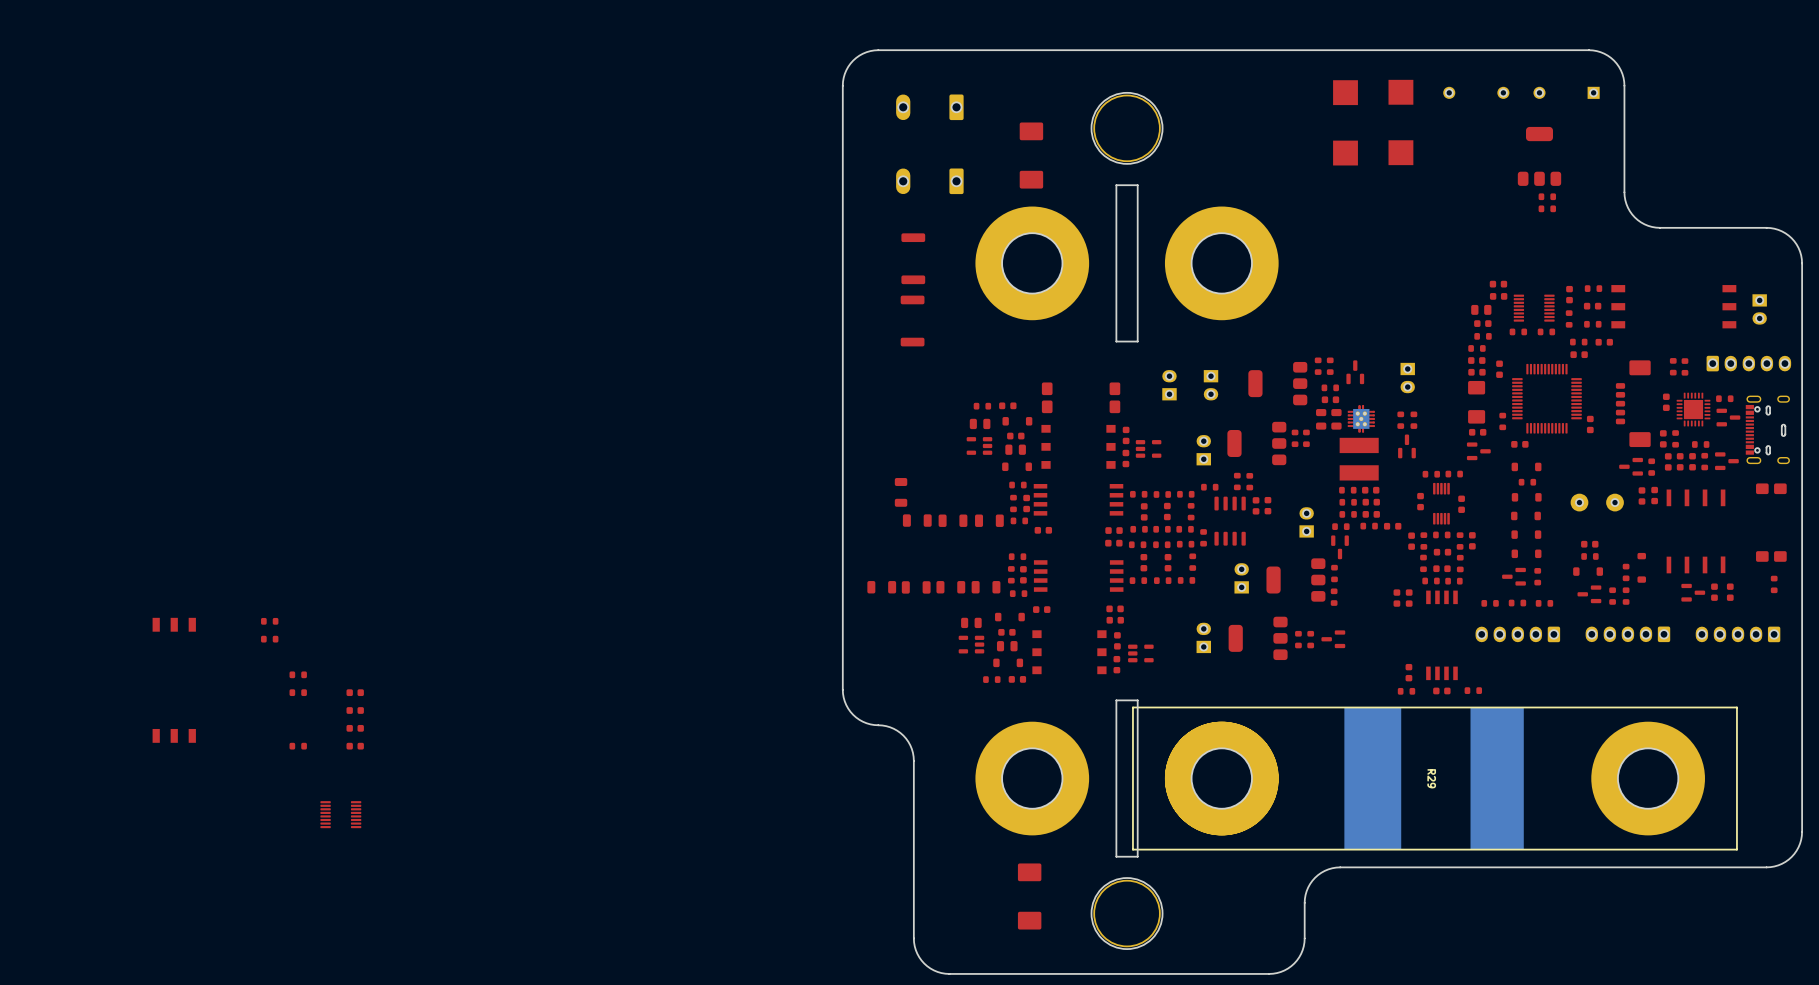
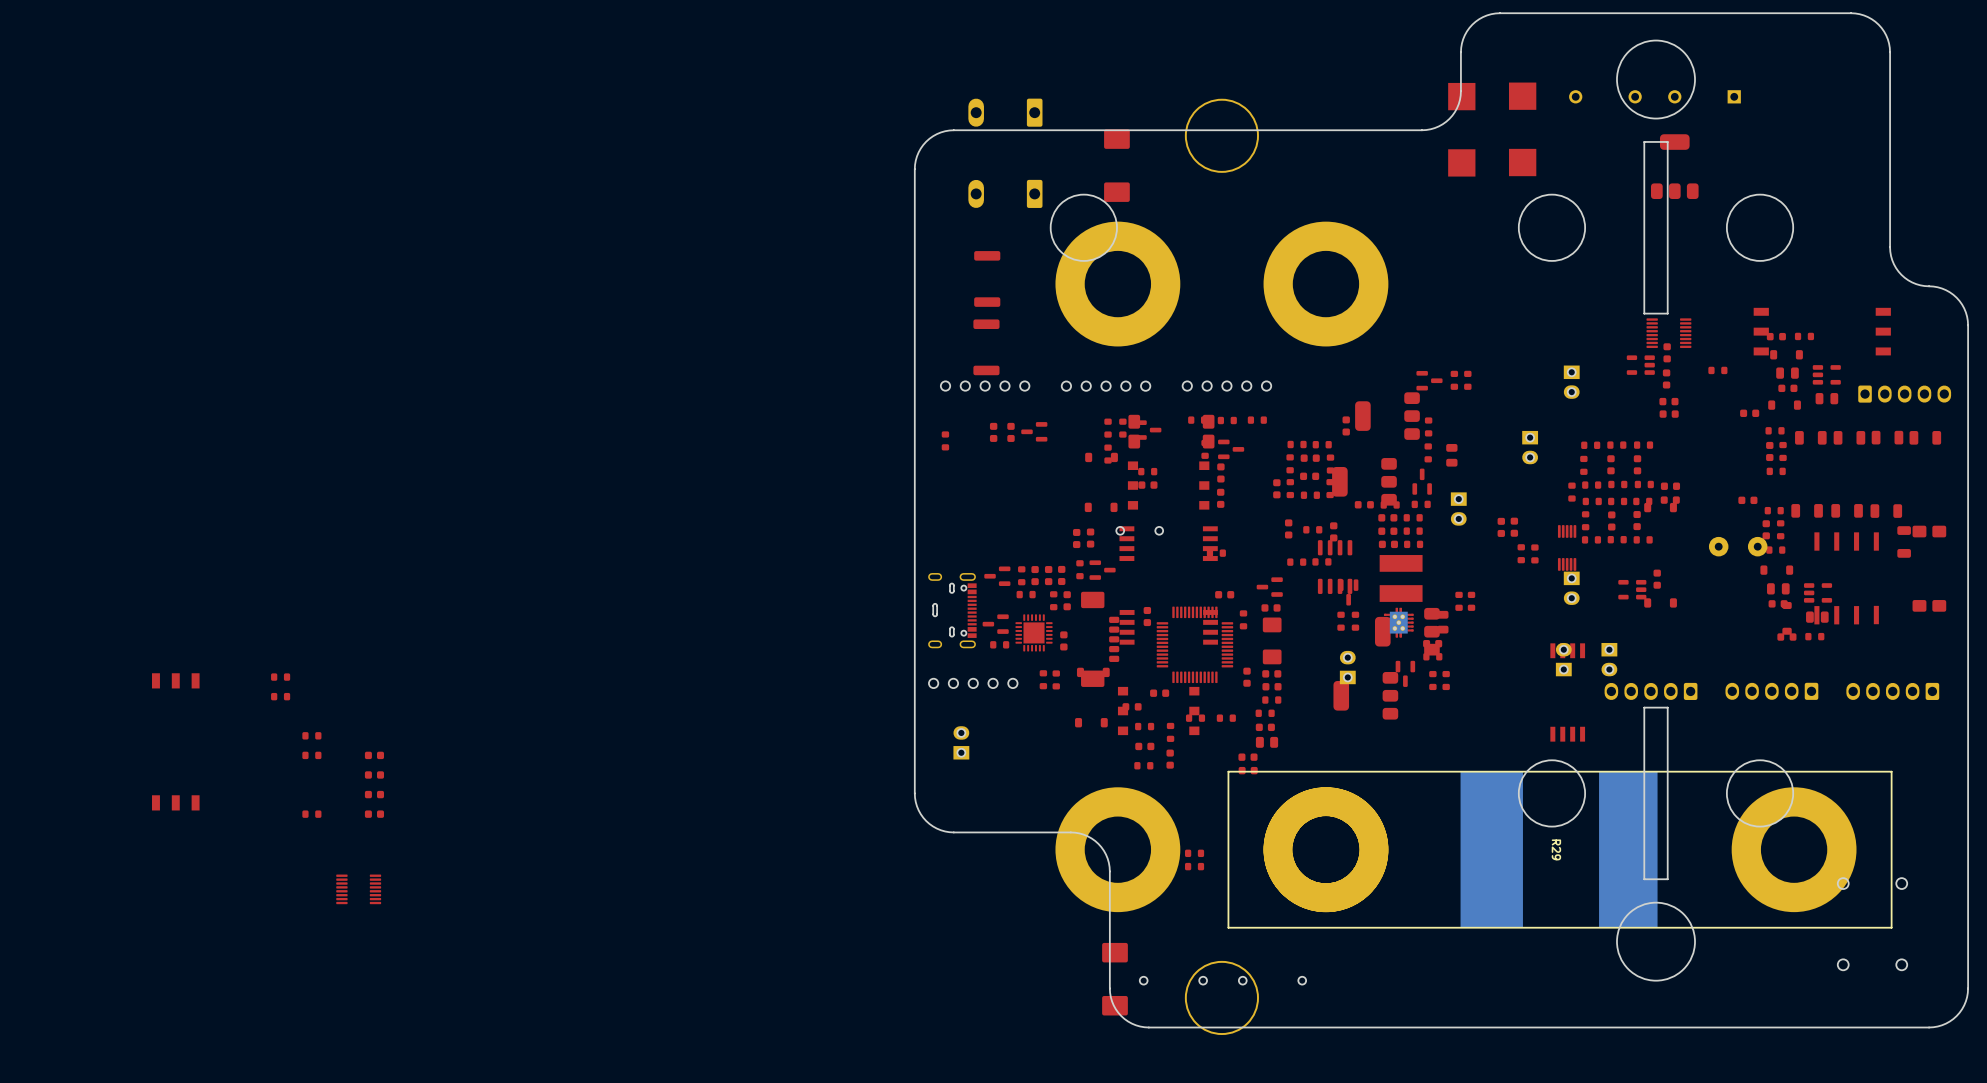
round board edge: none -> [1616, 39, 1696, 120]
board edge: (1588, 50) (878, 50) (862, 53) (850, 63) (844, 73) (842, 85) (843, 693) (848, 708) (856, 717) (866, 723) (886, 726) (897, 730) (906, 738) (911, 749) (913, 760) (914, 942) (919, 957) (927, 966) (937, 971) (949, 973) (1273, 973) (1288, 968) (1299, 957) (1304, 942) (1306, 891) (1315, 877) (1332, 868) (1766, 867) (1781, 863) (1794, 853) (1800, 843) (1802, 831) (1801, 255) (1791, 238) (1774, 228) (1655, 227) (1644, 224) (1634, 217) (1627, 207) (1624, 196) (1623, 77) (1619, 66) (1611, 57) (1600, 52) (1588, 50) -> (1851, 13) (1863, 15) (1875, 21) (1884, 31) (1889, 47) (1890, 247) (1892, 260) (1898, 271) (1908, 280) (1920, 285) (1941, 288) (1953, 294) (1962, 304) (1967, 320) (1968, 988) (1965, 1001) (1959, 1012) (1946, 1023) (1929, 1027) (1148, 1027) (1135, 1025) (1124, 1018) (1115, 1009) (1110, 992) (1109, 867) (1105, 854) (1098, 843) (1087, 836) (1075, 832) (945, 831) (926, 821) (915, 802) (914, 169) (916, 156) (923, 144) (936, 134) (953, 130) (1426, 130) (1442, 124) (1454, 112) (1460, 95) (1460, 52) (1463, 39) (1472, 24) (1491, 14) (1851, 13)
round board edge: [1445, 88, 1454, 97] -> none
round board edge: [1499, 88, 1508, 97] -> none
round board edge: [1535, 88, 1544, 97] -> none
round board edge: [1589, 88, 1598, 97] -> none
round board edge: [1090, 92, 1164, 165] -> none
round board edge: [897, 101, 909, 113] -> none
round board edge: [950, 101, 963, 113] -> none
board edge: none -> (1667, 141) (1667, 313) (1644, 313) (1644, 141) (1667, 141)
round board edge: [897, 175, 909, 187] -> none
round board edge: [950, 175, 963, 187] -> none
round board edge: none -> [1518, 194, 1586, 262]
round board edge: none -> [1726, 194, 1794, 262]
board edge: (1137, 185) (1137, 341) (1116, 341) (1116, 185) (1137, 185) -> none
part: (1547, 196) -> none
part: (1547, 208) -> none
round board edge: [1191, 232, 1253, 295] -> none
round board edge position: (1032, 263) -> (1083, 227)
part: (1498, 284) -> none
part: (1593, 288) -> none
part: (1569, 294) -> none
part: (1498, 296) -> none
round board edge: [1755, 296, 1764, 305] -> none
part: (1592, 306) -> none
part: (1481, 309) -> none
part: (1759, 309) -> none
part: none -> (1804, 336)
round board edge: [1755, 314, 1764, 323] -> none
part: (1569, 318) -> none
part: (1482, 323) -> none
part: (1592, 324) -> none
part: none -> (1667, 352)
part: none -> (1786, 354)
part: (1518, 331) -> none
part: (1546, 331) -> none
part: (1483, 336) -> none
part: none -> (1640, 365)
round board edge: none -> [1567, 367, 1577, 377]
part position: (1604, 342) -> (1776, 336)
part: none -> (1787, 373)
part: none -> (1826, 374)
part: (1476, 348) -> none
part: none -> (1666, 378)
round board edge: none -> [940, 380, 951, 392]
round board edge: none -> [960, 380, 971, 392]
round board edge: none -> [979, 380, 991, 392]
round board edge: none -> [999, 380, 1011, 392]
round board edge: none -> [1019, 380, 1031, 392]
round board edge: none -> [1061, 380, 1072, 392]
round board edge: none -> [1080, 380, 1092, 392]
round board edge: none -> [1100, 380, 1112, 392]
round board edge: none -> [1120, 380, 1132, 392]
round board edge: none -> [1140, 380, 1151, 392]
round board edge: none -> [1181, 380, 1193, 392]
round board edge: none -> [1201, 380, 1213, 392]
round board edge: none -> [1221, 380, 1233, 392]
round board edge: none -> [1241, 380, 1253, 392]
round board edge: none -> [1261, 380, 1272, 392]
part: none -> (1454, 380)
part: none -> (1467, 380)
part: none -> (1571, 382)
part: (1579, 354) -> none
round board edge: none -> [1567, 387, 1577, 397]
part: none -> (1787, 388)
round board edge: [1707, 358, 1718, 369] -> none
round board edge: [1725, 358, 1736, 369] -> none
round board edge: [1744, 358, 1754, 369] -> none
round board edge: [1762, 358, 1772, 369] -> none
round board edge: [1780, 358, 1790, 369] -> none
part: (1476, 360) -> none
round board edge: [1403, 364, 1412, 374] -> none
part: (1318, 366) -> none
part: (1330, 366) -> none
part: (1673, 366) -> none
part: (1684, 366) -> none
part: none -> (1826, 398)
part: (1499, 369) -> none
part: none -> (1668, 401)
round board edge: [1165, 372, 1174, 381] -> none
round board edge: [1206, 372, 1216, 381] -> none
part rotation: 0° (1355, 372) -> 90° clockwise (1429, 380)
part position: (1355, 372) -> (1429, 380)
part: (1476, 372) -> none
part: none -> (1784, 405)
part: (1407, 378) -> none
part: none -> (1669, 414)
part: none -> (1749, 413)
part: (1169, 385) -> none
part: (1211, 385) -> none
part: none -> (1197, 420)
part: none -> (1227, 420)
part: none -> (1257, 420)
part: (1330, 387) -> none
round board edge position: (1407, 387) -> (1530, 437)
round board edge: [1165, 390, 1174, 399] -> none
round board edge: [1206, 390, 1216, 399] -> none
part: none -> (1346, 425)
part: none -> (1428, 426)
part footprint: [1662, 393, 1670, 411] -> [1795, 431, 1827, 445]
part: none -> (1108, 428)
part: none -> (1122, 428)
part: none -> (1148, 430)
part: none -> (1034, 431)
part: none -> (1775, 430)
part: none -> (993, 432)
part: none -> (1011, 432)
part: (1546, 398) -> none
part: (1724, 398) -> none
part: (1330, 399) -> none
part: (1476, 402) -> none
part: (1633, 403) -> none
part: none -> (1849, 437)
part: none -> (1887, 437)
part: none -> (1925, 437)
part: (1007, 405) -> none
part: none -> (945, 440)
part: (982, 406) -> none
board edge: (1770, 407) (1769, 413) (1767, 414) (1766, 407) (1770, 407) -> none
part: none -> (1297, 444)
part: none -> (1322, 444)
part footprint: [1316, 409, 1327, 430] -> [1424, 443, 1432, 463]
part: (1693, 409) -> none
part: none -> (1590, 445)
part: none -> (1616, 445)
part: none -> (1643, 445)
round board edge: [1356, 412, 1360, 416] -> none
round board edge: [1363, 412, 1367, 416] -> none
part: none -> (1530, 447)
part: none -> (1205, 449)
part: none -> (1231, 449)
part: none -> (1769, 451)
part: none -> (1783, 451)
round board edge: [1359, 417, 1363, 421] -> none
round board edge: none -> [1525, 452, 1535, 463]
part: (1728, 417) -> none
part: none -> (1108, 454)
part position: (1361, 418) -> (1398, 622)
part: (1400, 420) -> none
part: (1413, 420) -> none
part: none -> (1310, 458)
part: (1502, 421) -> none
round board edge: [1356, 422, 1360, 426] -> none
round board edge: [1363, 422, 1367, 426] -> none
part: (980, 423) -> none
part: (1590, 424) -> none
board edge: (1785, 426) (1785, 434) (1783, 435) (1781, 426) (1783, 424) (1785, 426) -> none
part: none -> (1290, 463)
part: none -> (1330, 464)
part: none -> (1637, 464)
part: none -> (1583, 465)
part footprint: [1303, 429, 1310, 448] -> [1412, 468, 1432, 495]
part: (1767, 429) -> none
part rotation: 0° (1477, 432) -> 90° clockwise (1610, 464)
part: none -> (1776, 471)
part: none -> (1147, 471)
part: (1015, 436) -> none
round board edge: [1199, 437, 1208, 446] -> none
part: none -> (1309, 476)
part: (1295, 438) -> none
part: (1663, 438) -> none
part: (1675, 438) -> none
part: (1519, 444) -> none
part: (1700, 444) -> none
part: (979, 445) -> none
part: none -> (1617, 484)
part: none -> (1644, 484)
part: none -> (1147, 485)
part: (1406, 446) -> none
part: none -> (1591, 485)
part: none -> (1670, 486)
board edge: (1770, 447) (1769, 453) (1767, 454) (1766, 447) (1770, 447) -> none
part: (1148, 448) -> none
part: (1015, 449) -> none
part: none -> (1276, 488)
part: none -> (1290, 488)
part: none -> (1330, 488)
part: (1203, 450) -> none
part: (1478, 451) -> none
part: none -> (1571, 492)
round board edge: [1199, 455, 1208, 464] -> none
part: none -> (1310, 495)
round board edge: none -> [1454, 494, 1464, 504]
part footprint: [1619, 457, 1643, 476] -> [1764, 506, 1784, 515]
part position: (1359, 459) -> (1401, 578)
part: none -> (1670, 500)
part: none -> (1747, 500)
part: none -> (1592, 501)
part: none -> (1617, 501)
part: none -> (1642, 501)
part: (1668, 461) -> none
part: (1680, 461) -> none
part: (1692, 461) -> none
part: (1704, 461) -> none
part: (1726, 461) -> none
part: none -> (1364, 504)
part: none -> (1390, 504)
part: none -> (1421, 504)
part: (1651, 467) -> none
part: none -> (1458, 509)
part: none -> (1807, 510)
part: none -> (1847, 510)
part: none -> (1886, 511)
round board edge: none -> [1454, 514, 1464, 524]
part: (1431, 474) -> none
part rotation: 0° (1454, 474) -> 90° clockwise (1585, 520)
part: none -> (1387, 517)
part: none -> (1413, 517)
part: none -> (1637, 520)
part: none -> (1611, 520)
part: (1237, 481) -> none
part: (1249, 481) -> none
part: (1527, 482) -> none
round board edge: none -> [1115, 526, 1125, 536]
round board edge: none -> [1154, 526, 1164, 536]
part: none -> (1514, 527)
part: (1017, 485) -> none
part: none -> (1501, 527)
part: none -> (1288, 528)
part: none -> (1766, 529)
part: none -> (1780, 529)
part: none -> (1387, 531)
part: none -> (1413, 531)
part: none -> (1333, 531)
part: (1347, 490) -> none
part: (1370, 490) -> none
part: (901, 492) -> none
part: none -> (1090, 538)
part: (1138, 494) -> none
part: (1162, 494) -> none
part: (1185, 494) -> none
part: none -> (1076, 538)
part: (1641, 495) -> none
part: (1654, 495) -> none
part: none -> (1591, 539)
part: none -> (1617, 539)
part: none -> (1643, 539)
part: (1526, 497) -> none
round board edge: [1575, 498, 1584, 507] -> none
round board edge: [1610, 498, 1620, 507] -> none
part: none -> (1904, 541)
part: none -> (1388, 544)
part: none -> (1413, 544)
part: (1420, 501) -> none
part: (1348, 502) -> none
part: (1371, 502) -> none
part: (1013, 503) -> none
part: (1026, 503) -> none
part: (1461, 504) -> none
part: (1256, 505) -> none
part: (1267, 505) -> none
part: none -> (1775, 550)
part: none -> (1216, 553)
part: none -> (1521, 553)
round board edge: [1302, 509, 1311, 518] -> none
part: none -> (1534, 553)
part: (1144, 511) -> none
part: (1167, 511) -> none
part rotation: 0° (1191, 511) -> 90° clockwise (1296, 562)
part: (1348, 514) -> none
part: (1371, 514) -> none
part: (1525, 515) -> none
part: none -> (1321, 561)
part footprint: [1010, 517, 1029, 525] -> [1089, 560, 1116, 580]
part: (917, 520) -> none
part: (953, 520) -> none
part: (989, 520) -> none
part: (1306, 522) -> none
part: none -> (1079, 569)
part: none -> (1776, 570)
part: (1340, 526) -> none
part: (1369, 526) -> none
part: (1392, 526) -> none
round board edge: [1302, 527, 1311, 536] -> none
round board edge: none -> [1567, 573, 1577, 583]
part: none -> (1035, 575)
part: none -> (1048, 575)
part: none -> (1061, 575)
part: none -> (997, 576)
part: none -> (1021, 575)
part: (1139, 529) -> none
part: (1162, 529) -> none
part: (1185, 529) -> none
part: (1043, 530) -> none
part: (1114, 530) -> none
part footprint: [1511, 530, 1542, 539] -> [1653, 569, 1661, 589]
part: (1441, 534) -> none
part footprint: [1331, 535, 1349, 560] -> [1455, 591, 1463, 611]
board edge: none -> (953, 585) (953, 591) (951, 592) (950, 584) (952, 583) (953, 585)
part: (1203, 537) -> none
part: none -> (1269, 587)
part: none -> (1571, 588)
part: (1472, 540) -> none
part: none -> (1778, 588)
part: (1411, 541) -> none
part: (1423, 541) -> none
part: (1460, 541) -> none
part: none -> (1632, 589)
part: (1113, 543) -> none
part: (1137, 544) -> none
part: (1161, 544) -> none
part: (1185, 544) -> none
part: none -> (1348, 592)
part: (1589, 544) -> none
part: none -> (1818, 592)
round board edge: none -> [1567, 593, 1577, 603]
part: none -> (1026, 594)
part: none -> (1224, 594)
part: none -> (1053, 600)
part: none -> (1067, 600)
part: none -> (1471, 601)
part: (1442, 552) -> none
part: none -> (1778, 603)
board edge: none -> (937, 605) (937, 614) (934, 616) (933, 605) (935, 603) (937, 605)
part: (1017, 556) -> none
part: (1589, 556) -> none
part: none -> (952, 610)
part: (1143, 562) -> none
part rotation: 0° (1168, 562) -> 90° clockwise (1271, 607)
part: (1192, 562) -> none
part: (1423, 563) -> none
part: (1460, 563) -> none
round board edge: none -> [1393, 615, 1397, 619]
round board edge: none -> [1401, 615, 1405, 619]
part footprint: [1331, 564, 1338, 583] -> [1437, 610, 1449, 634]
round board edge: [1237, 565, 1246, 574] -> none
part: none -> (1147, 616)
part: none -> (1817, 617)
part: (1441, 568) -> none
part: none -> (1243, 619)
part: none -> (1341, 621)
part: none -> (1355, 621)
round board edge: none -> [1397, 621, 1401, 625]
part: (1588, 571) -> none
part: (1626, 572) -> none
part: none -> (995, 624)
part: (1011, 574) -> none
part: (1023, 574) -> none
round board edge: none -> [1393, 626, 1397, 631]
round board edge: none -> [1401, 626, 1405, 631]
part: (1514, 576) -> none
part: (1537, 576) -> none
board edge: none -> (953, 629) (953, 635) (951, 636) (950, 628) (952, 627) (953, 629)
part: (1241, 578) -> none
part: (1138, 580) -> none
part: (1162, 580) -> none
part: (1186, 580) -> none
part: (1431, 580) -> none
part: none -> (1034, 632)
part footprint: [971, 581, 1001, 594] -> [1060, 631, 1068, 651]
part: (1453, 581) -> none
part: none -> (1786, 637)
part: none -> (1814, 636)
part: (1774, 584) -> none
part: none -> (1100, 639)
part: (881, 587) -> none
part: (916, 587) -> none
part: (950, 587) -> none
round board edge position: (1241, 587) -> (1347, 657)
part: none -> (1272, 640)
part: none -> (1432, 643)
part: none -> (999, 644)
part: none -> (1194, 644)
round board edge: none -> [1559, 645, 1569, 655]
round board edge: none -> [1604, 645, 1614, 655]
part: (1693, 592) -> none
part: (1714, 592) -> none
part: (1730, 592) -> none
part: (1018, 593) -> none
part: (1589, 594) -> none
part: (1612, 596) -> none
part: (1626, 596) -> none
part: (1334, 597) -> none
part: (1396, 598) -> none
part: (1409, 598) -> none
part: none -> (1432, 656)
part: (1490, 603) -> none
part: (1517, 603) -> none
part: (1544, 603) -> none
part: none -> (1563, 659)
part: none -> (1609, 659)
part: (1115, 608) -> none
part: (1041, 609) -> none
round board edge: none -> [1559, 664, 1569, 675]
round board edge: none -> [1604, 664, 1614, 675]
part: none -> (1347, 667)
round board edge: none -> [1343, 672, 1353, 683]
part: none -> (1271, 673)
part: (1115, 620) -> none
part: none -> (1247, 677)
round board edge: none -> [928, 678, 939, 689]
round board edge: none -> [948, 678, 959, 689]
round board edge: none -> [967, 678, 979, 689]
round board edge: none -> [987, 678, 999, 689]
round board edge: none -> [1007, 678, 1019, 689]
part: (971, 622) -> none
part: none -> (1043, 679)
part: none -> (1056, 679)
round board edge: [1199, 624, 1208, 634] -> none
part: none -> (1432, 680)
part: none -> (1446, 680)
round board edge: [1476, 629, 1487, 640] -> none
round board edge: [1494, 629, 1505, 640] -> none
round board edge: [1512, 629, 1523, 640] -> none
round board edge: [1531, 629, 1541, 640] -> none
round board edge: [1549, 629, 1559, 640] -> none
round board edge: [1586, 629, 1597, 640] -> none
round board edge: [1605, 629, 1615, 640] -> none
round board edge: [1623, 629, 1633, 640] -> none
round board edge: [1641, 629, 1651, 640] -> none
round board edge: [1659, 629, 1669, 640] -> none
round board edge: [1697, 629, 1707, 640] -> none
round board edge: [1715, 629, 1725, 640] -> none
round board edge: [1733, 629, 1743, 640] -> none
round board edge: [1751, 629, 1761, 640] -> none
round board edge: [1769, 629, 1779, 640] -> none
part: none -> (1271, 686)
part: (1006, 632) -> none
part: none -> (1159, 693)
part: (1203, 637) -> none
part: (1298, 639) -> none
part: (1310, 639) -> none
part rotation: 0° (1333, 639) -> 90° counterclockwise (1405, 673)
part position: (1333, 639) -> (1405, 673)
part: (1117, 640) -> none
part: none -> (1271, 700)
round board edge: [1199, 642, 1208, 652] -> none
part: (971, 644) -> none
part: (1007, 646) -> none
board edge: none -> (1667, 707) (1667, 879) (1644, 879) (1644, 707) (1667, 707)
part: (1140, 653) -> none
part: none -> (1265, 713)
part: none -> (1195, 718)
part: none -> (1226, 718)
part: (1116, 664) -> none
part: none -> (1144, 726)
part: none -> (1265, 727)
round board edge: none -> [956, 728, 966, 738]
part: none -> (1170, 732)
part: (1408, 672) -> none
part: (991, 679) -> none
part position: (1017, 679) -> (1132, 706)
part: none -> (1267, 742)
part: none -> (961, 742)
part: none -> (1144, 746)
round board edge: none -> [956, 748, 966, 758]
part: (1441, 690) -> none
part: (1473, 690) -> none
part: (1406, 691) -> none
part: none -> (1247, 757)
part: none -> (1170, 759)
round board edge: none -> [1518, 759, 1586, 828]
board edge: (1137, 700) (1116, 700) (1116, 856) (1137, 856) (1137, 700) -> none
part: none -> (1143, 765)
part: none -> (1248, 770)
round board edge: [1001, 747, 1064, 810] -> none
round board edge: [1191, 747, 1253, 810] -> none
round board edge position: (1648, 778) -> (1760, 793)
part: none -> (1194, 853)
part: none -> (1194, 866)
round board edge: none -> [1837, 877, 1850, 890]
round board edge: none -> [1895, 877, 1908, 890]
round board edge: none -> [1616, 902, 1696, 982]
round board edge: [1090, 877, 1164, 950] -> none
round board edge: none -> [1837, 958, 1850, 971]
round board edge: none -> [1895, 958, 1908, 971]
round board edge: none -> [1139, 976, 1149, 986]
round board edge: none -> [1198, 976, 1208, 986]
round board edge: none -> [1238, 976, 1248, 986]
round board edge: none -> [1297, 976, 1307, 986]

